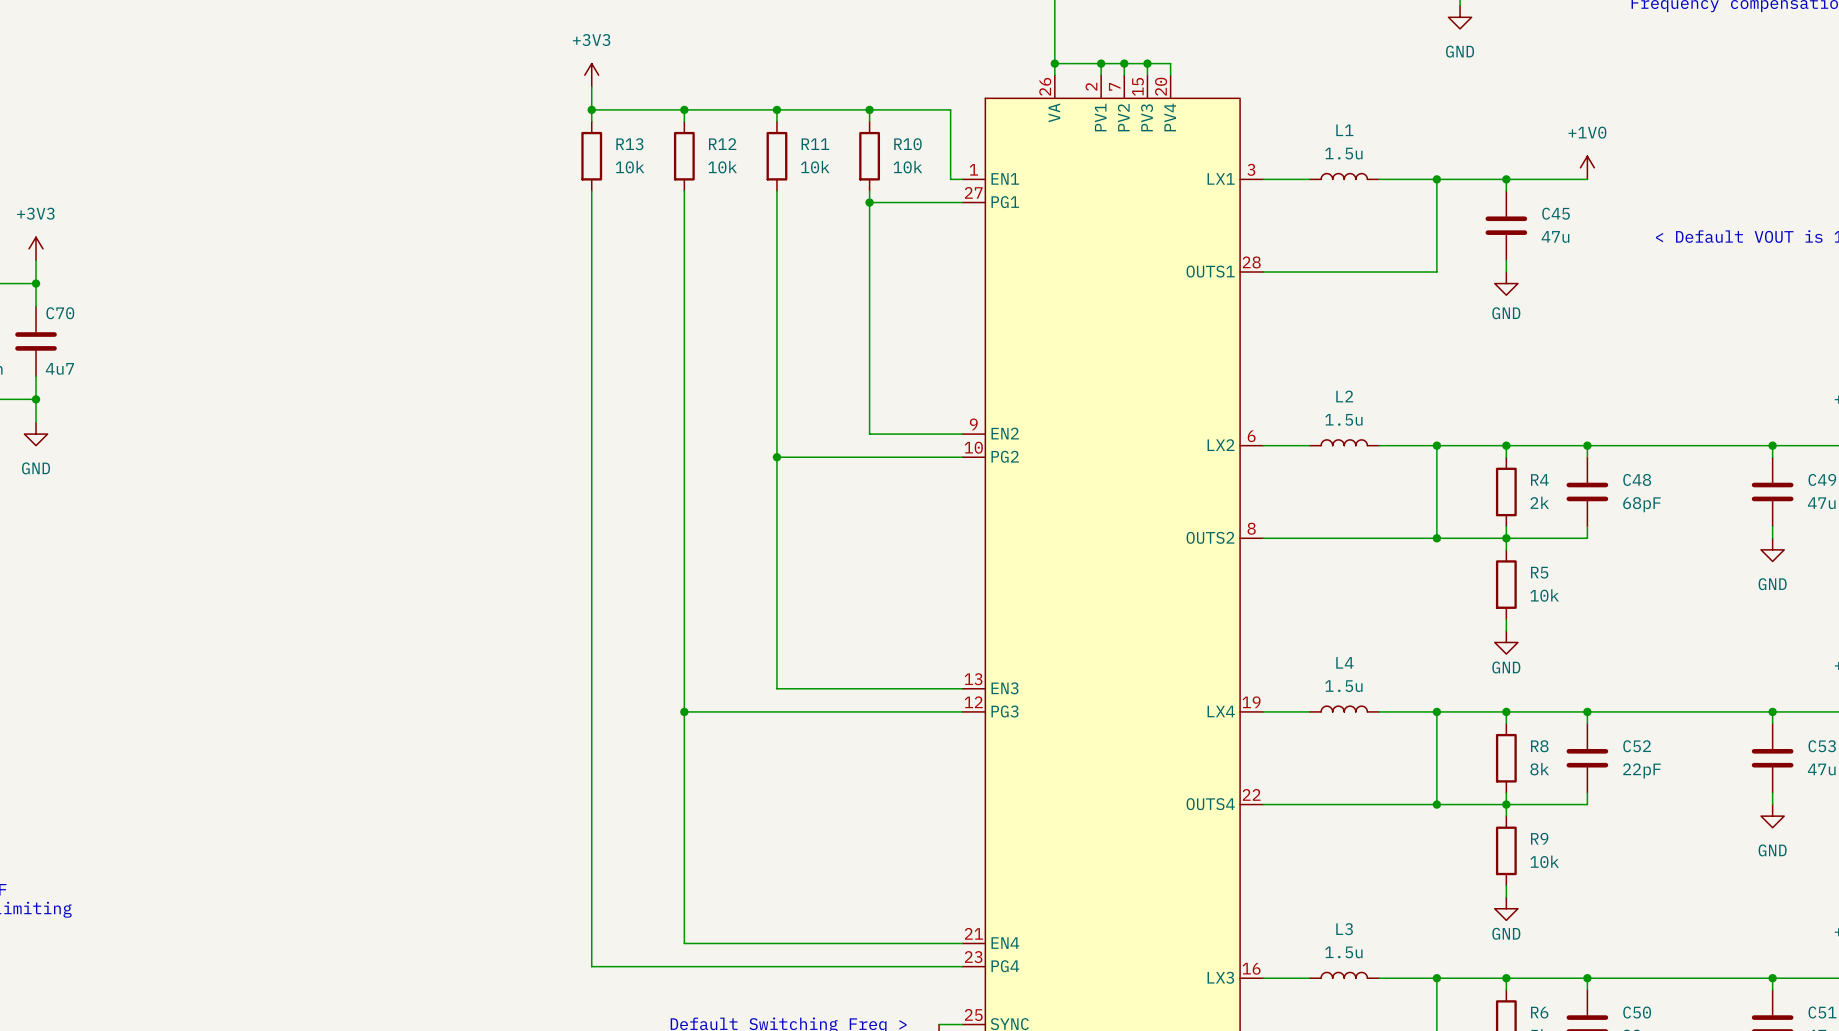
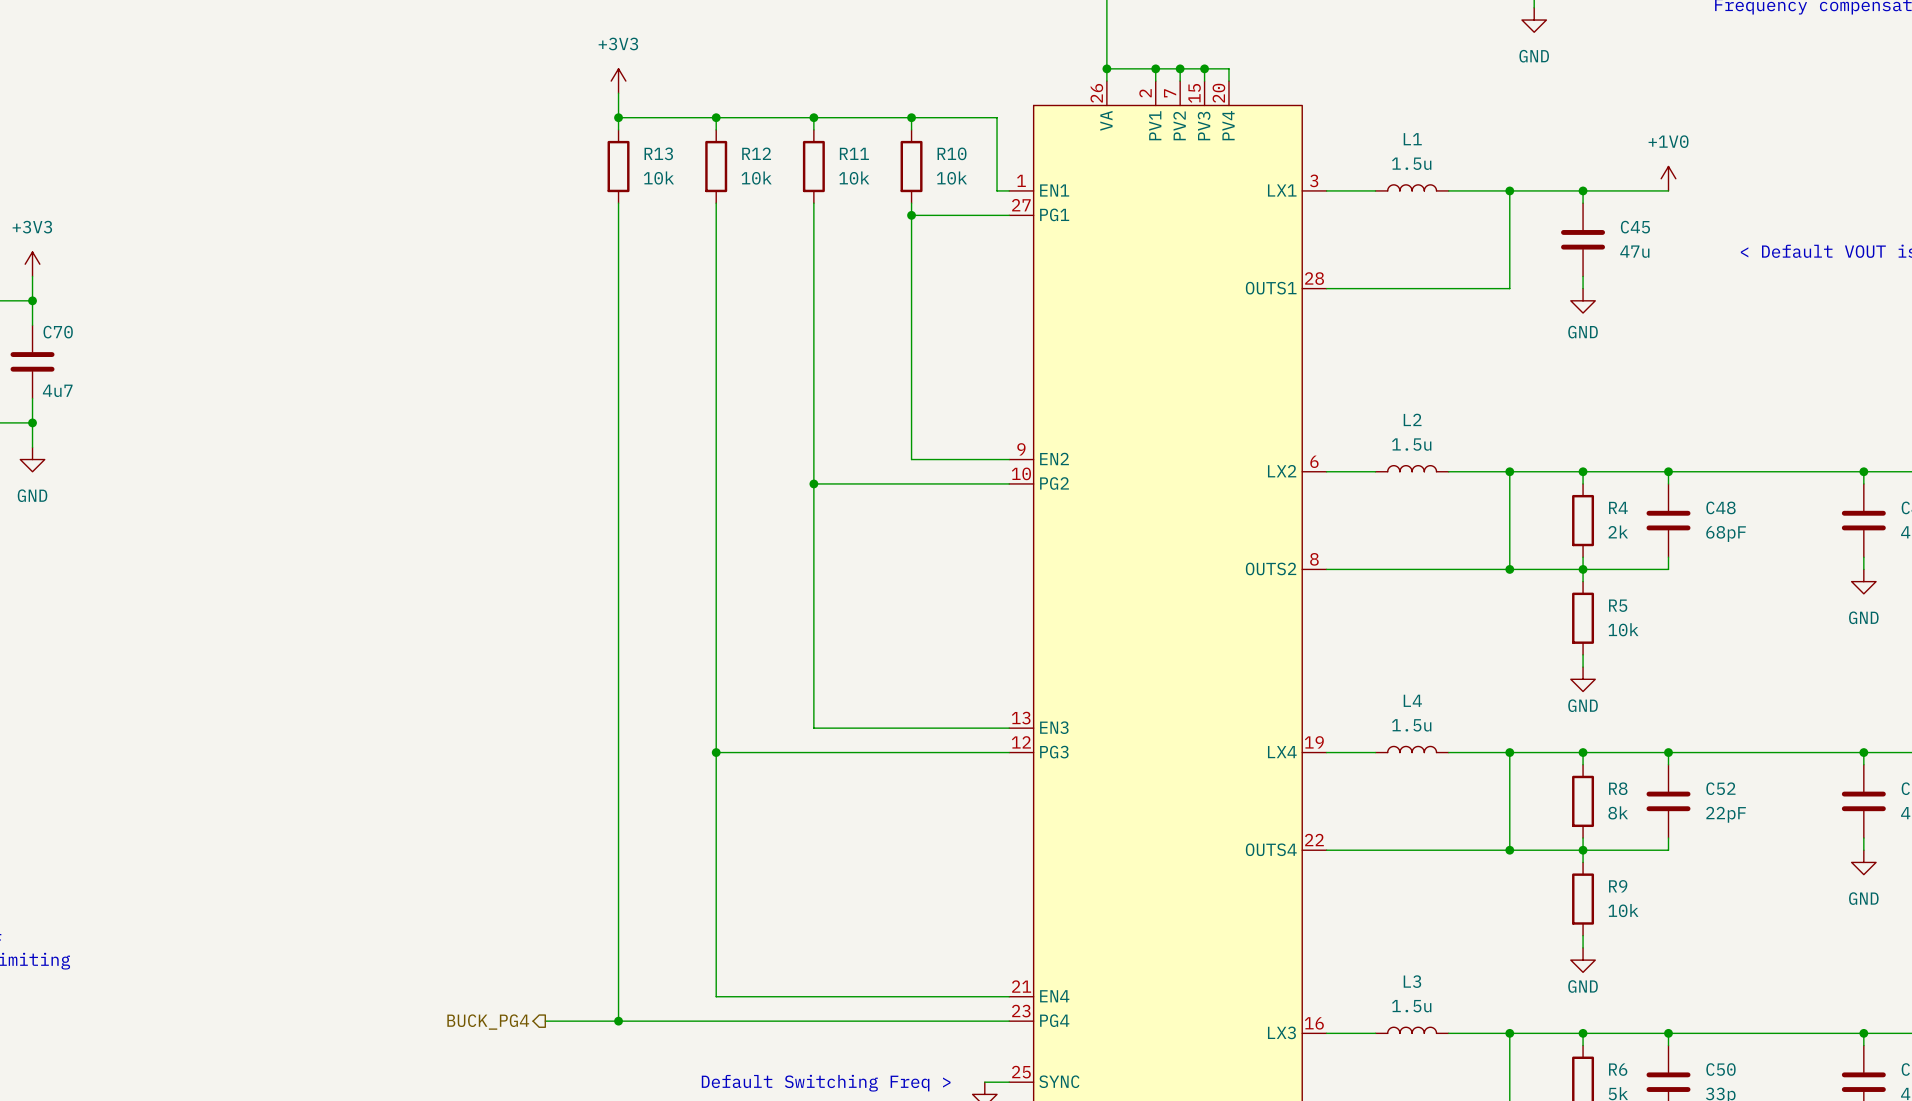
wire: none -> (545, 1021) (618, 1021)
junction: none -> (618, 1021)
hierarchical label: none -> BUCK_PG4 (488, 1022)

